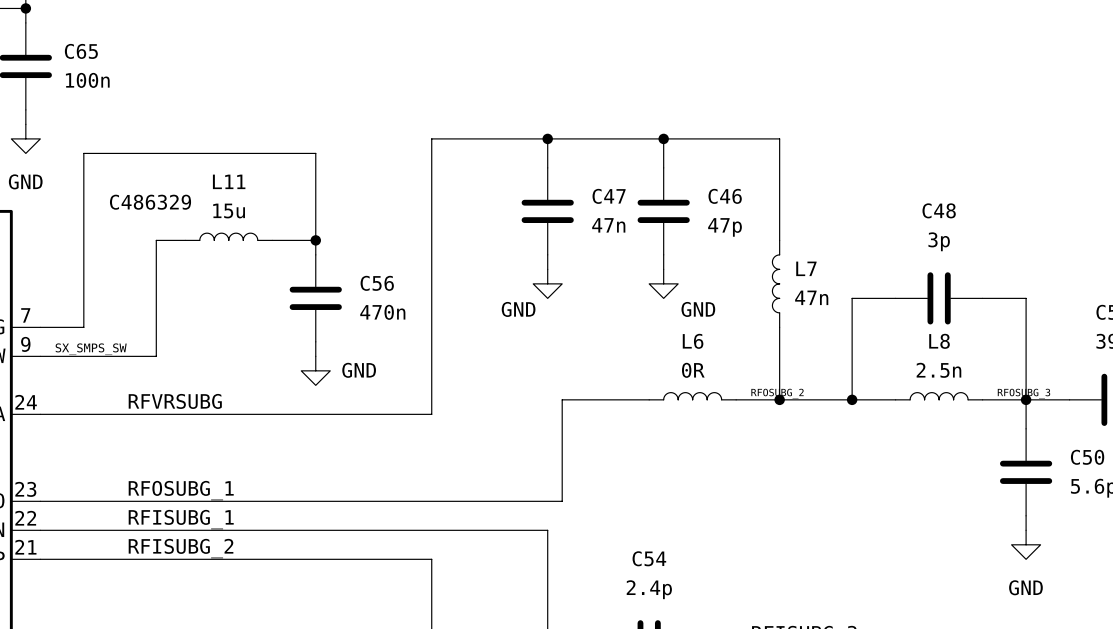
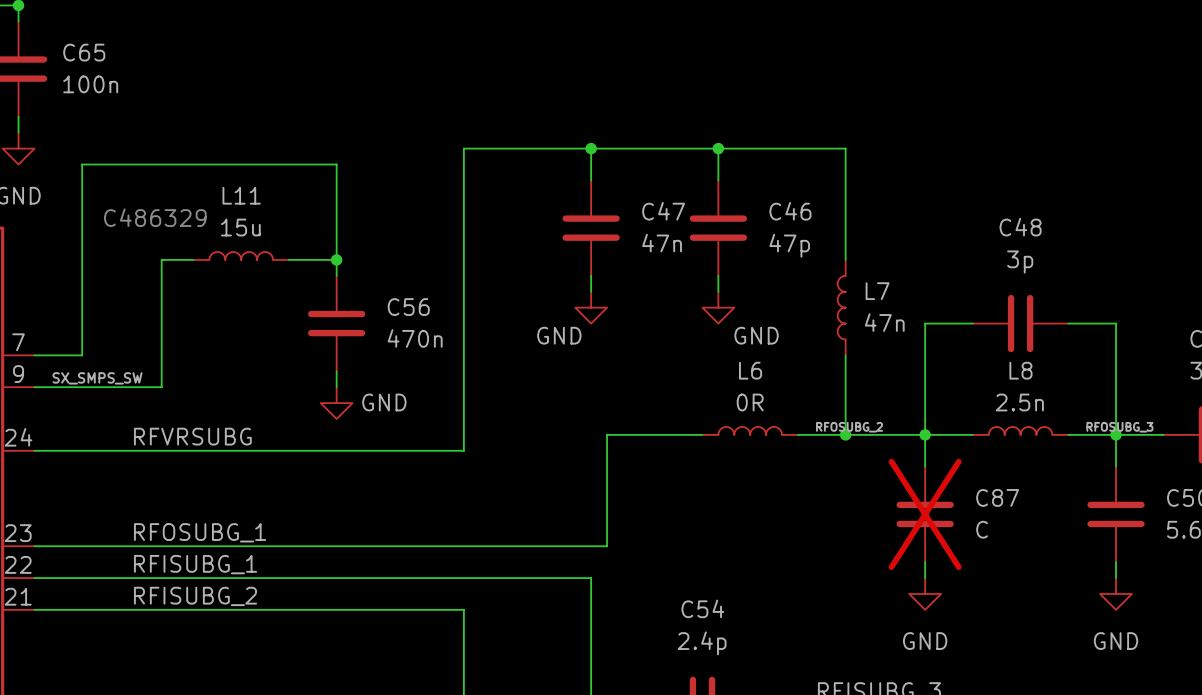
wire: none -> (925, 434) (925, 466)
C87: none -> C (925, 514)
wire: none -> (925, 562) (925, 578)
power symbol: none -> GND (925, 593)

